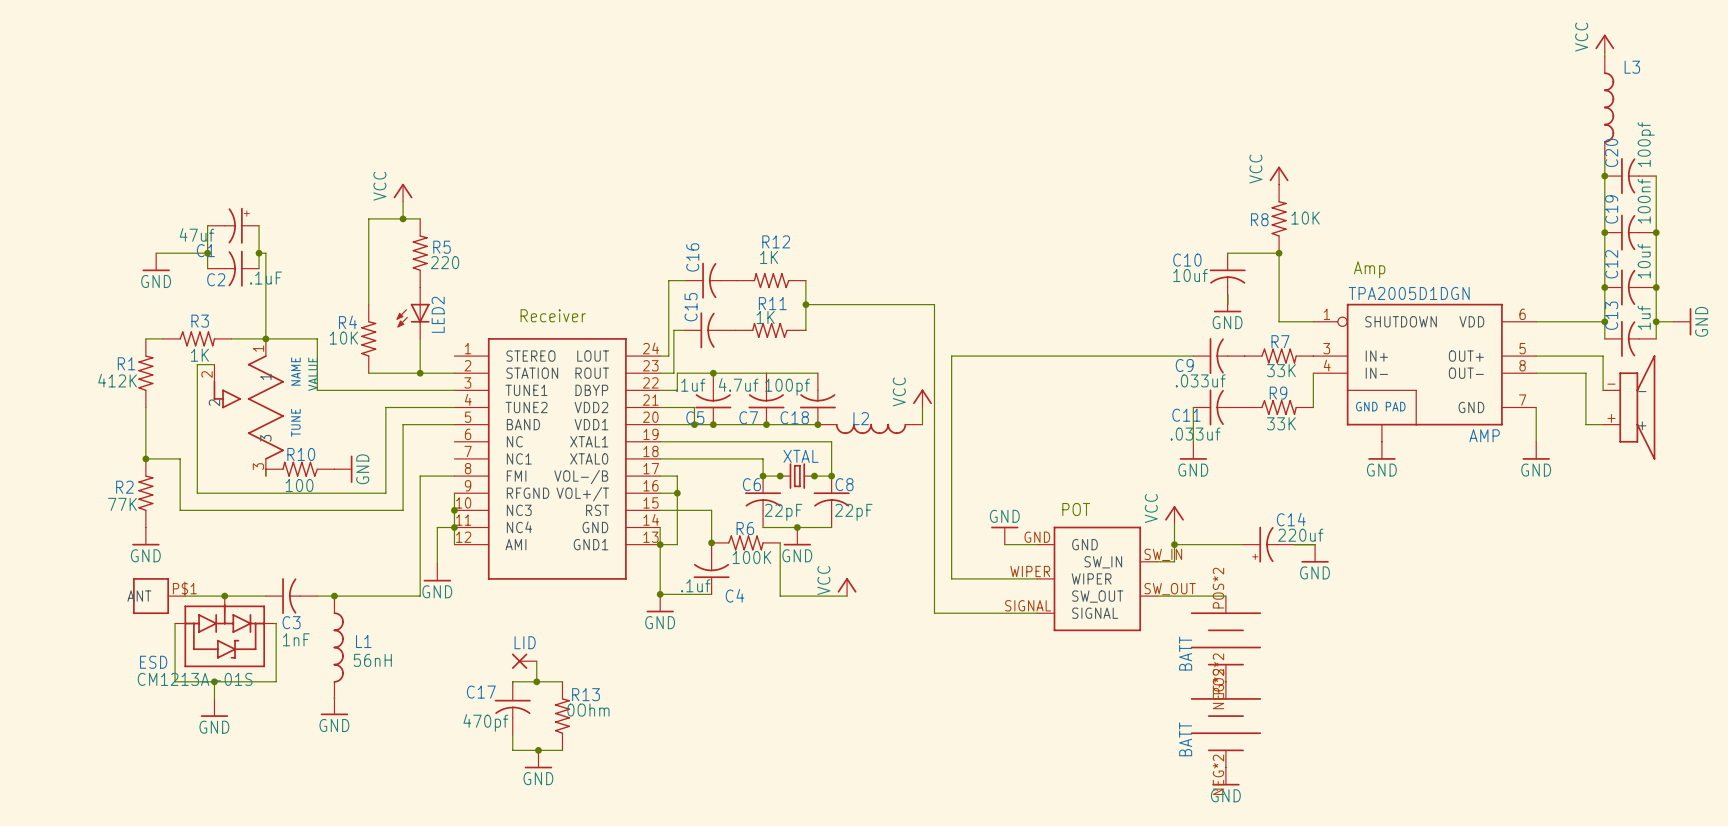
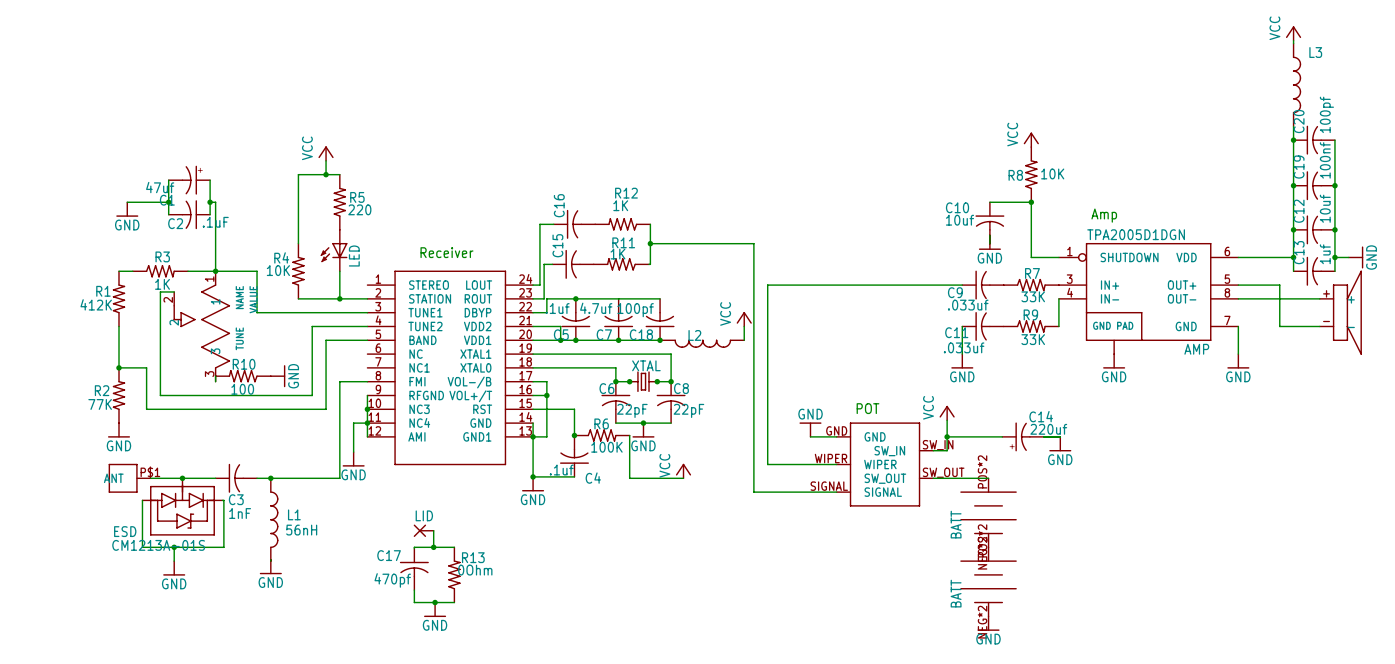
LED2 name: LED2 (438, 314) -> LED (354, 256)
wire: (1587, 356) (1603, 356) (1603, 390) -> (1279, 285) (1279, 326) (1319, 326)
wire: (1585, 373) (1585, 424) (1603, 424) -> (1278, 298) (1319, 298)
part: none -> (1340, 312)
part: (1629, 407) -> none

